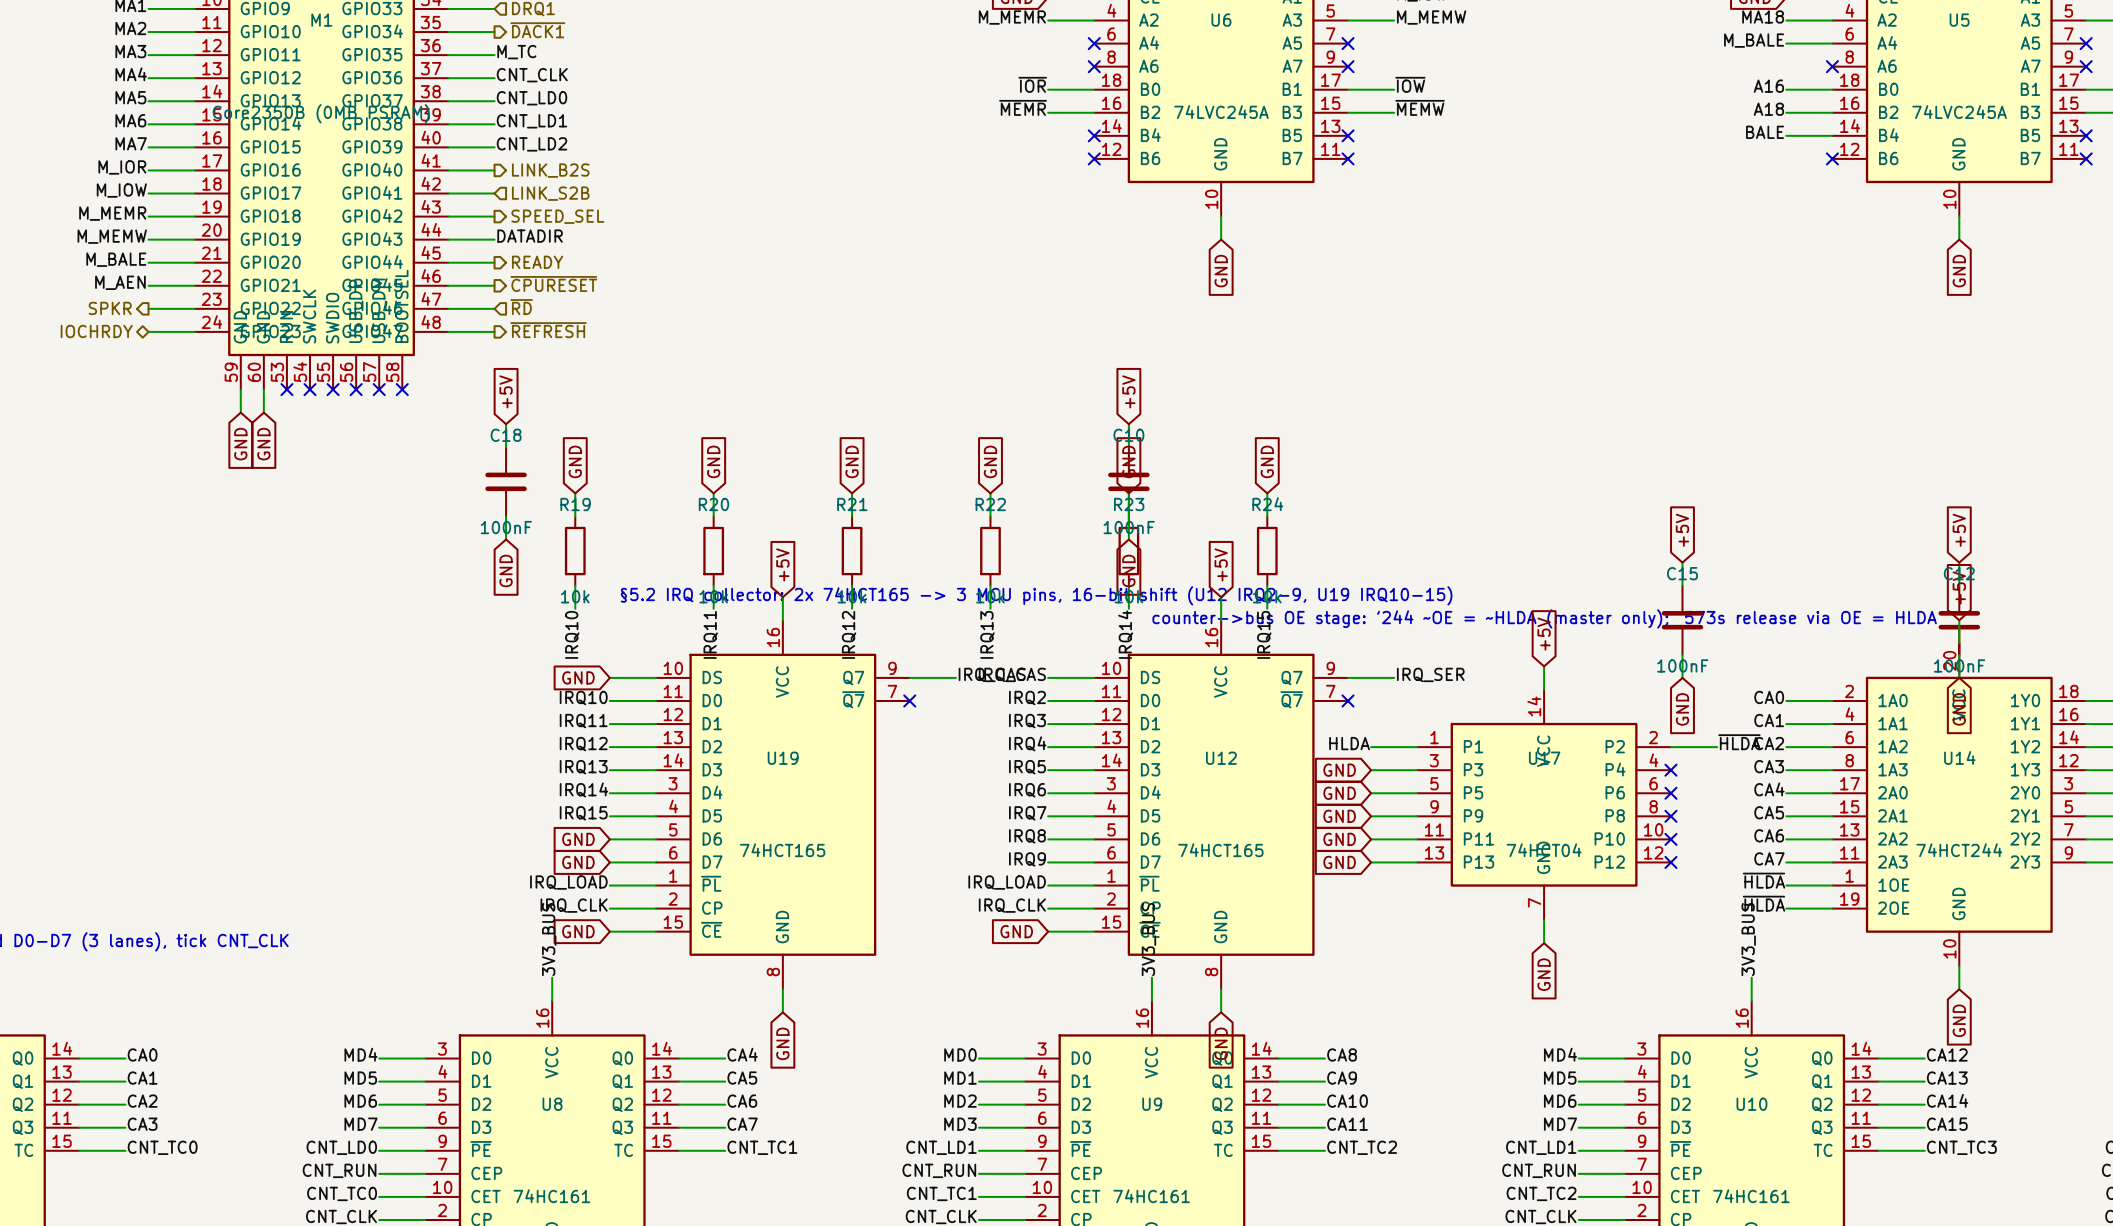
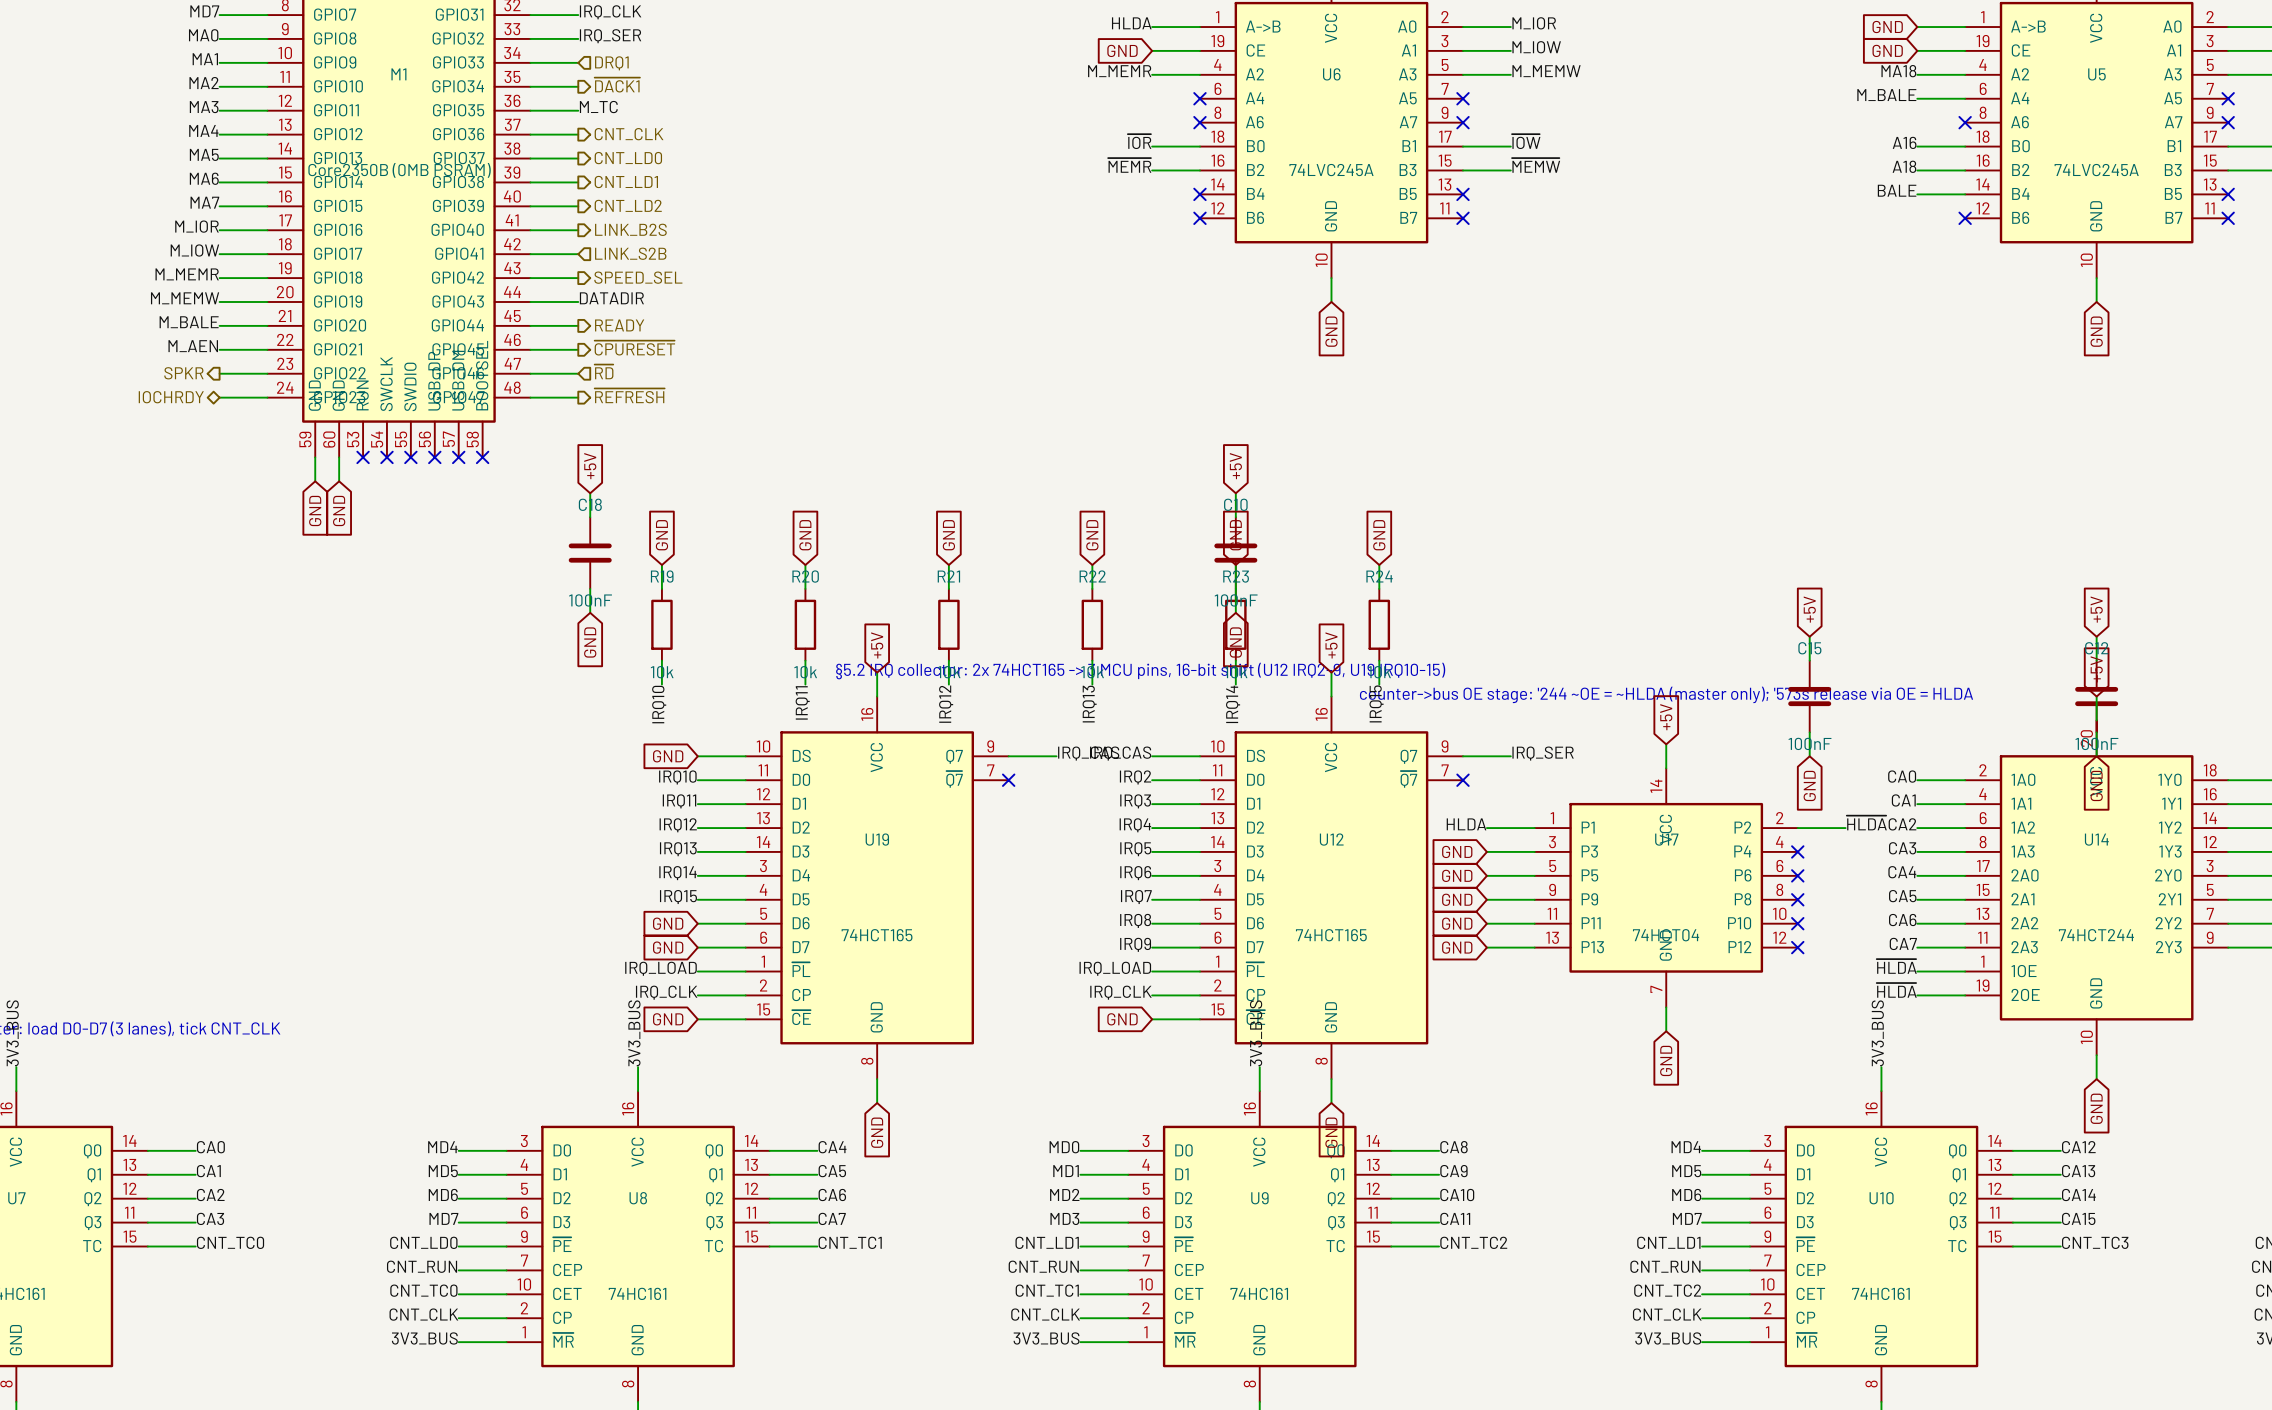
label: CNT_CLK (532, 75) -> none
hierarchical label: none -> CNT_CLK (629, 134)
label: CNT_LD0 (531, 98) -> none
hierarchical label: none -> CNT_LD0 (628, 158)
label: CNT_LD1 (531, 121) -> none
hierarchical label: none -> CNT_LD1 (626, 182)
label: CNT_LD2 (531, 144) -> none
hierarchical label: none -> CNT_LD2 (628, 205)

